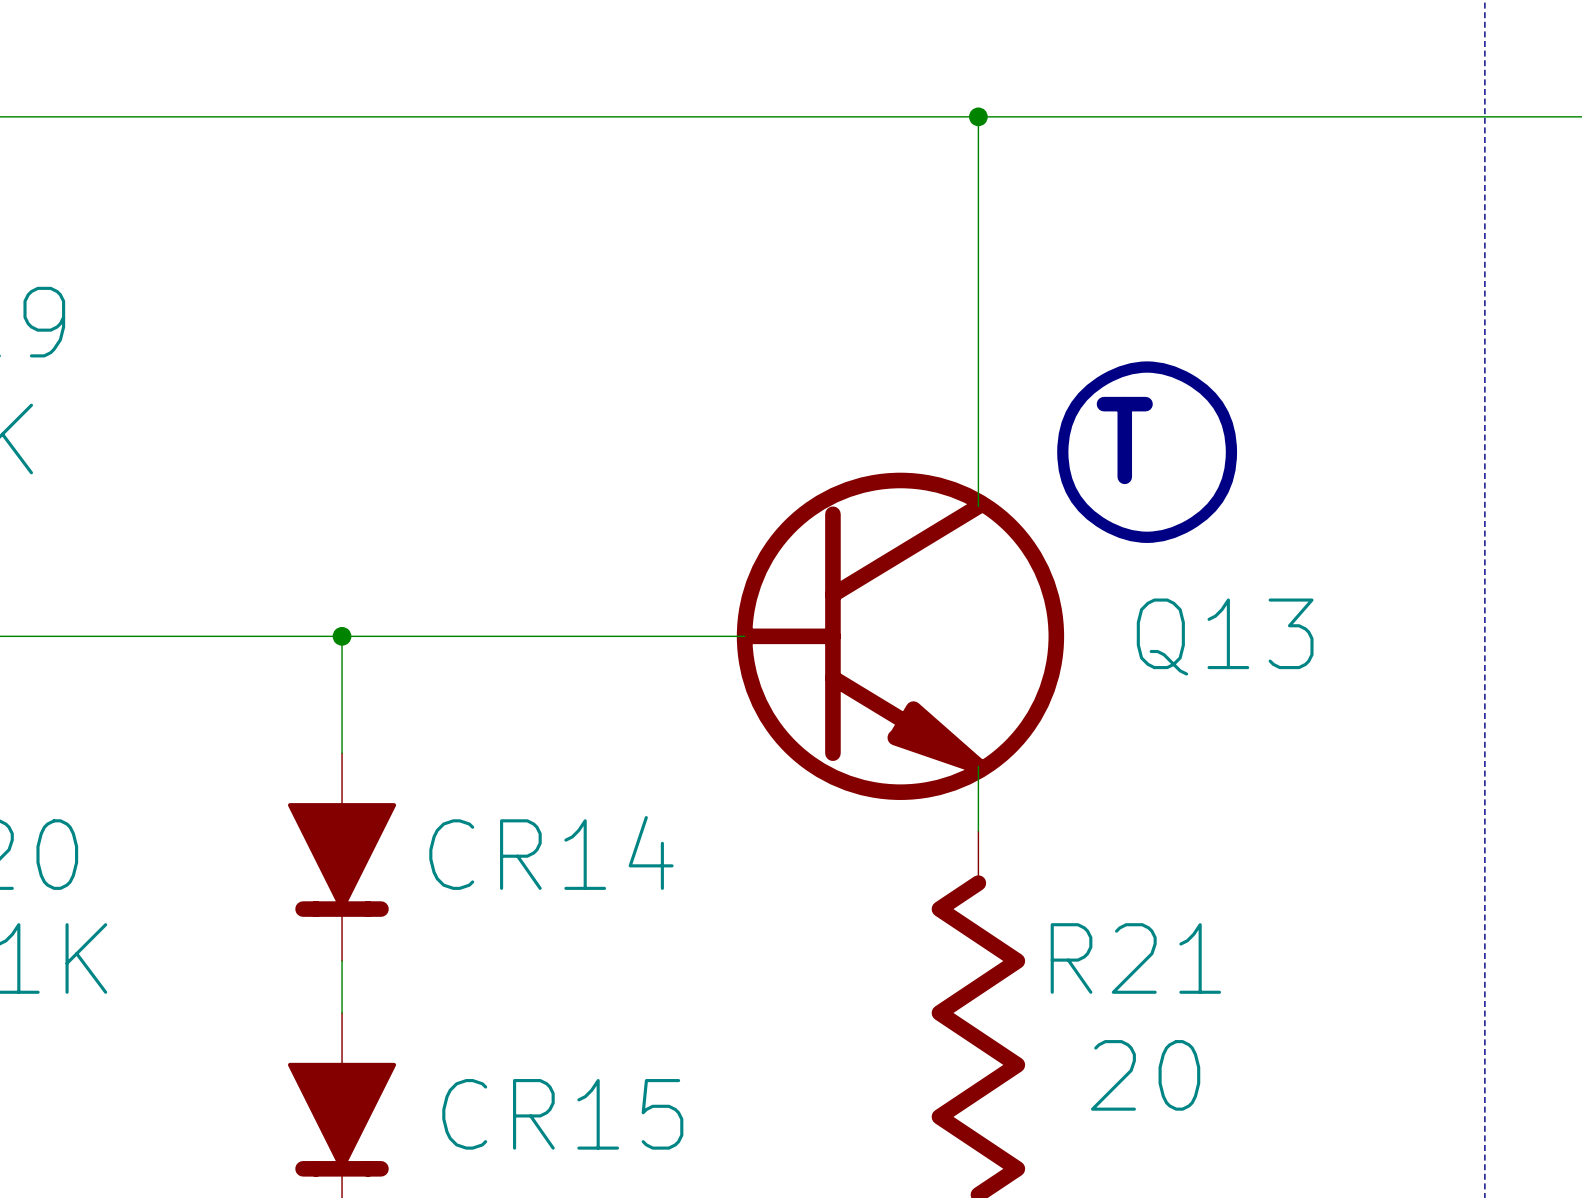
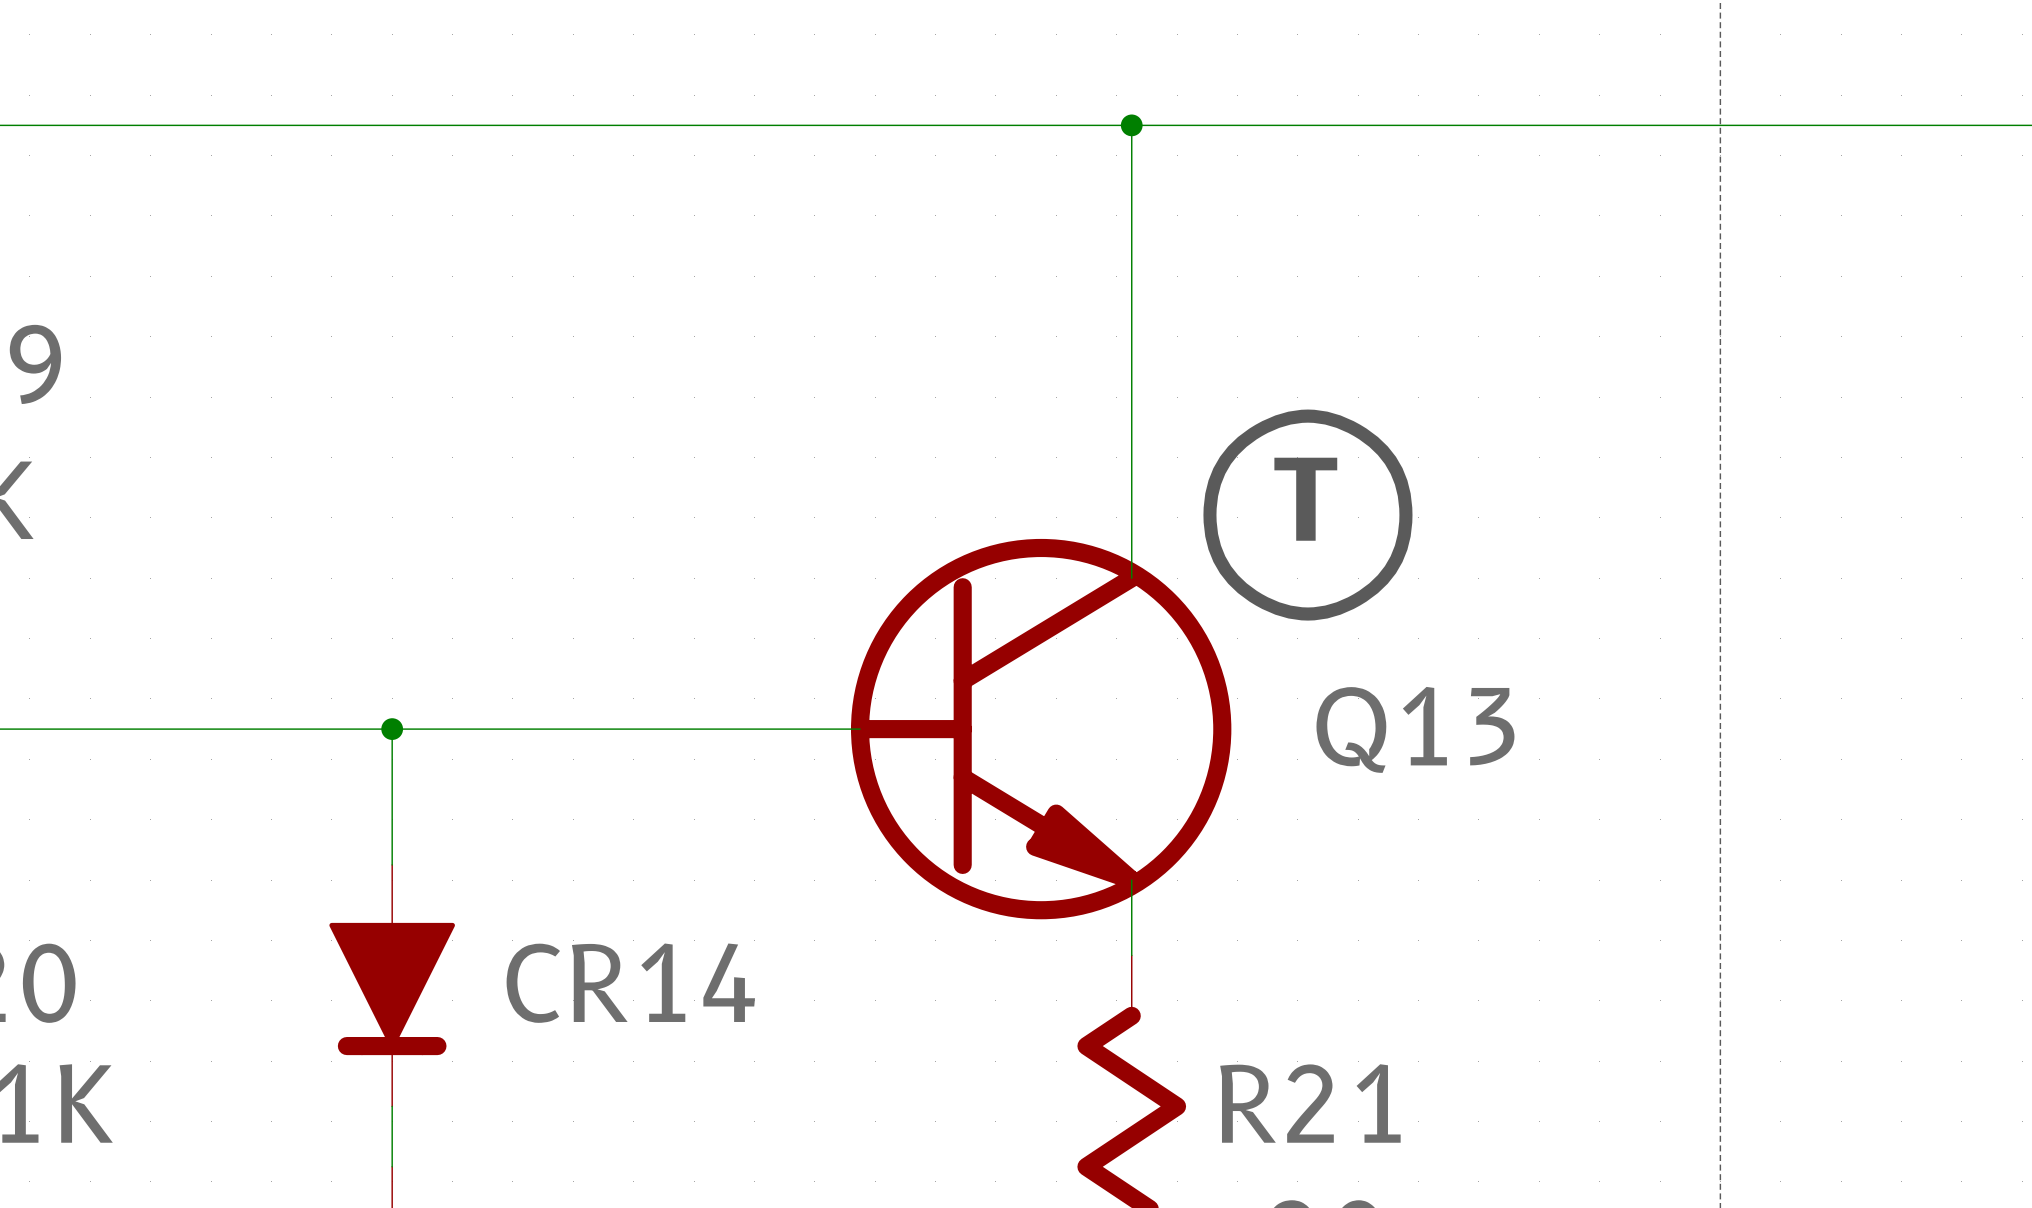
text position: T (1124, 440) -> T (1305, 499)

